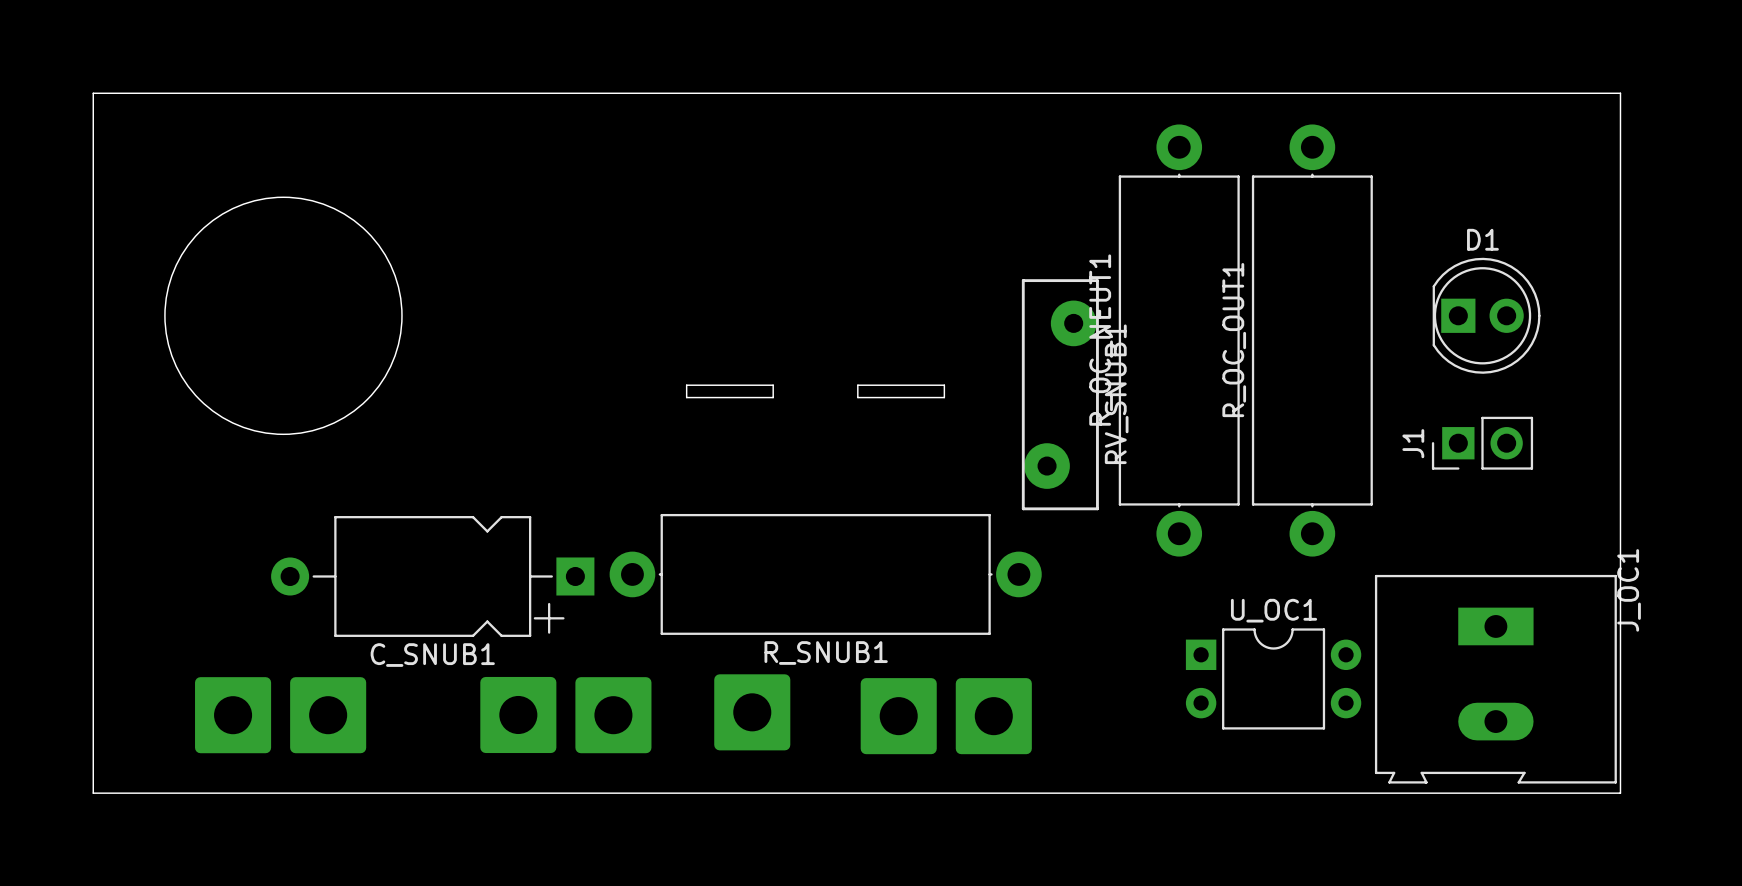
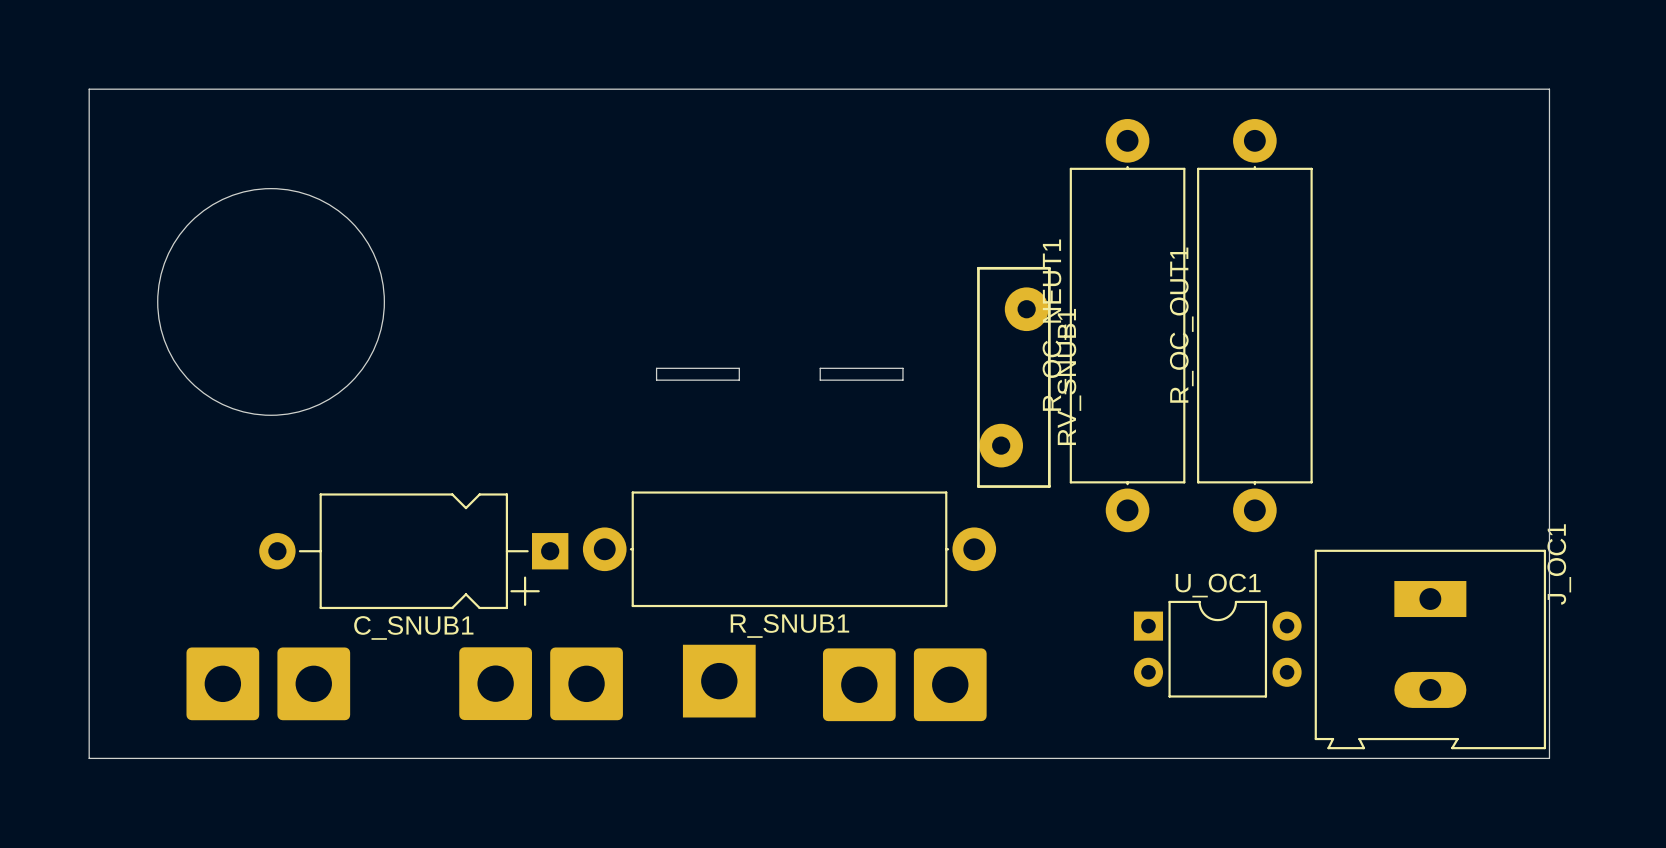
D1: (1486, 315) -> none
J1: (1482, 443) -> none
part footprint: [714, 674, 791, 751] -> [682, 644, 756, 718]

